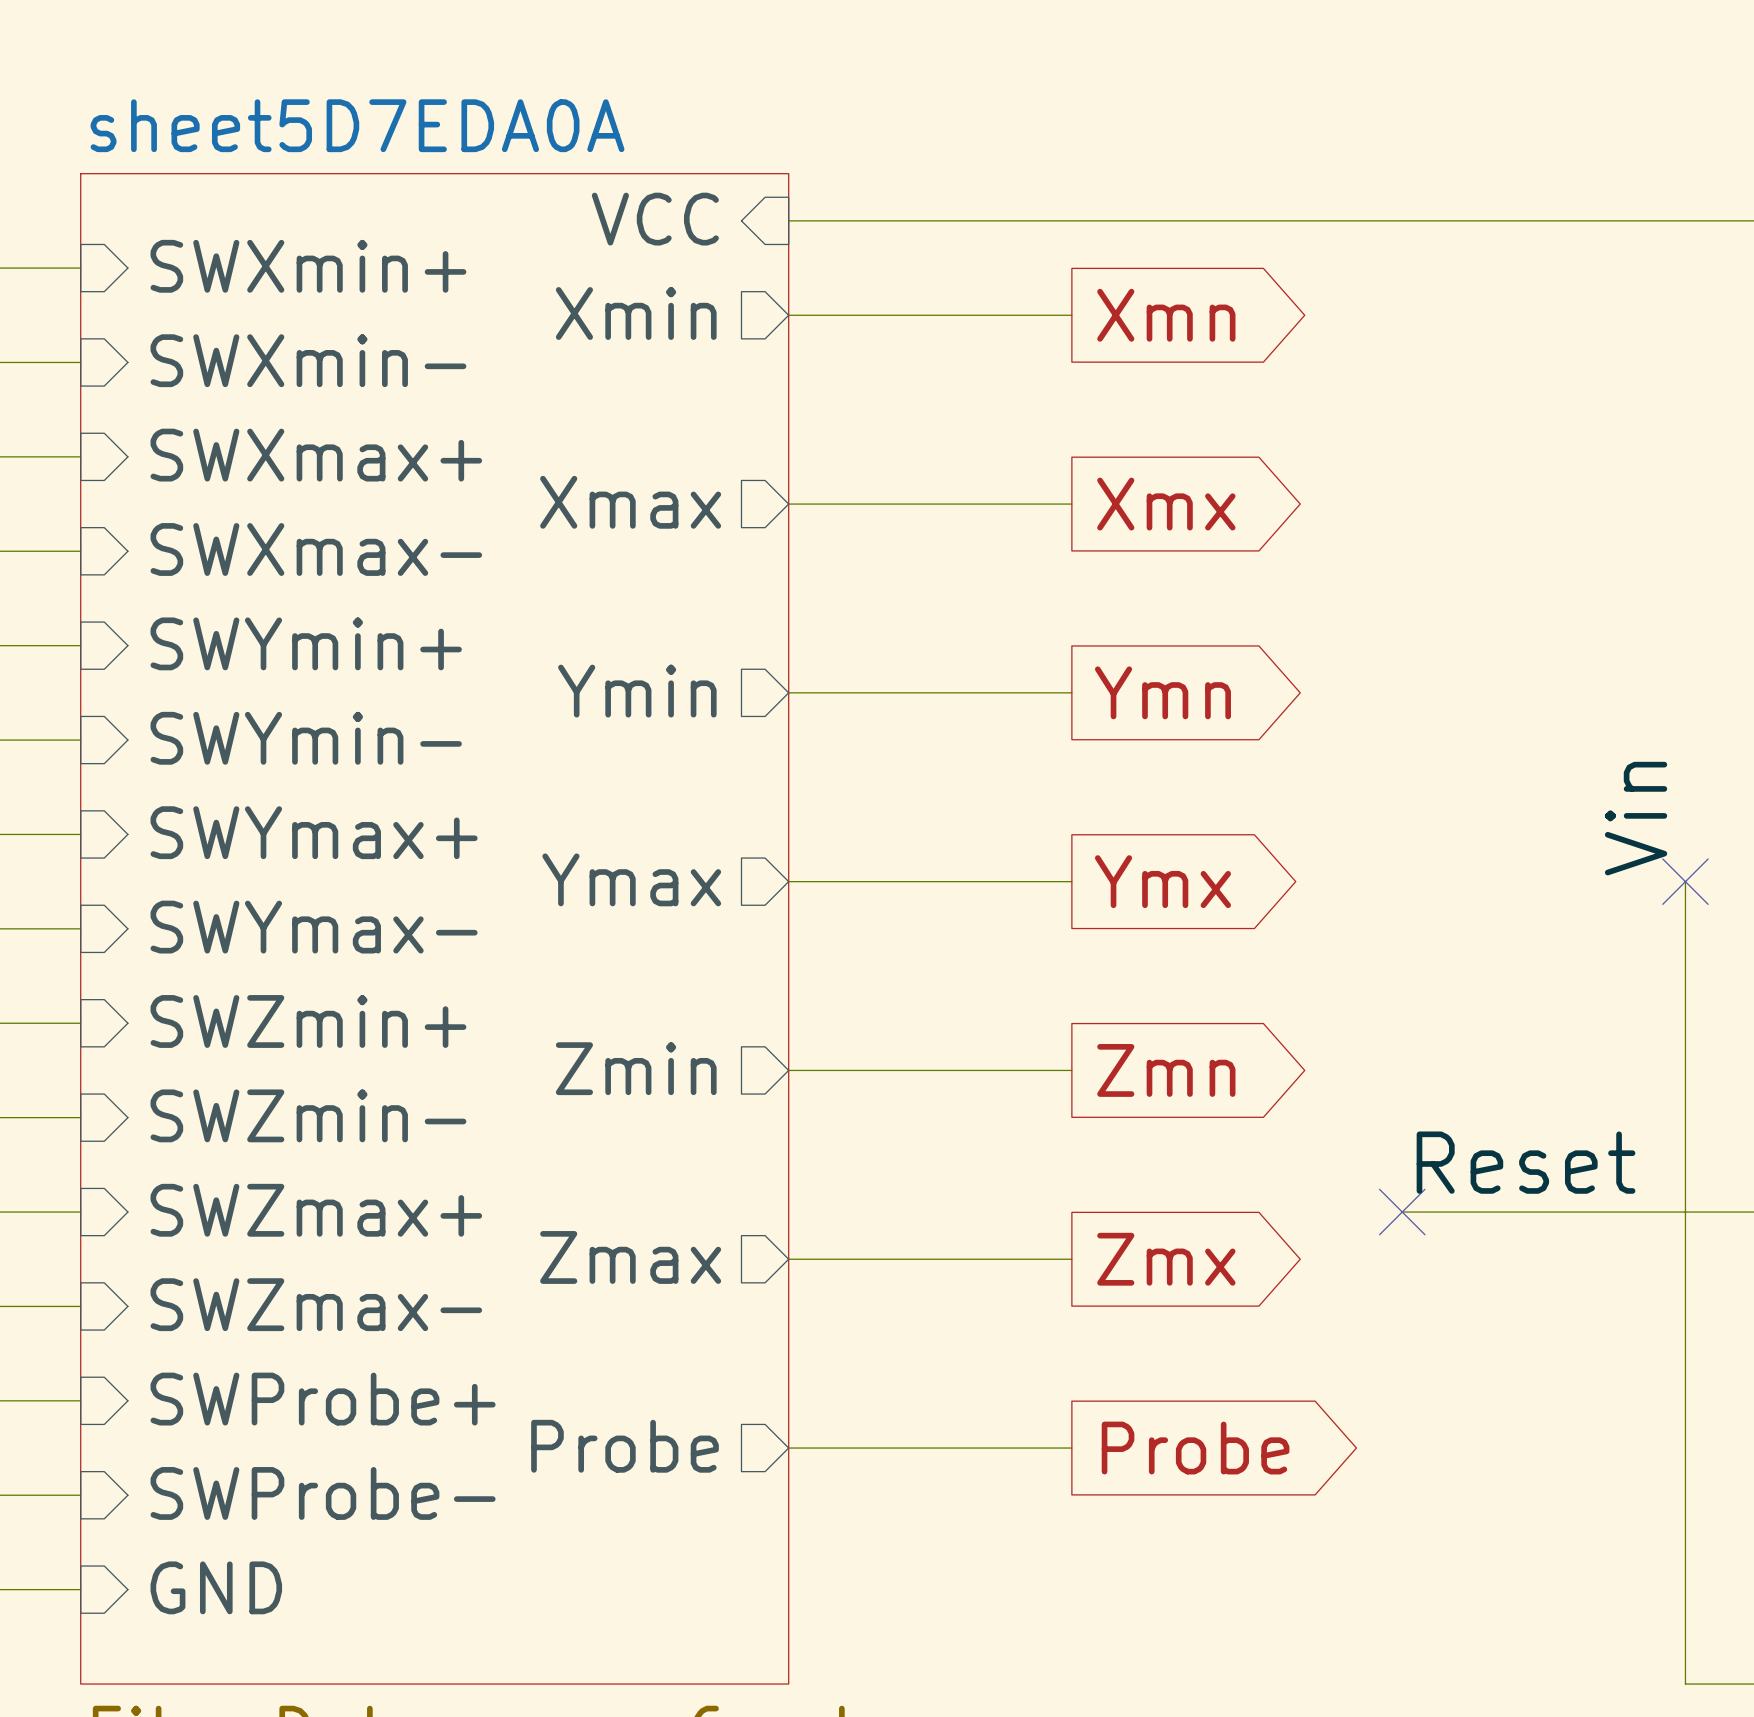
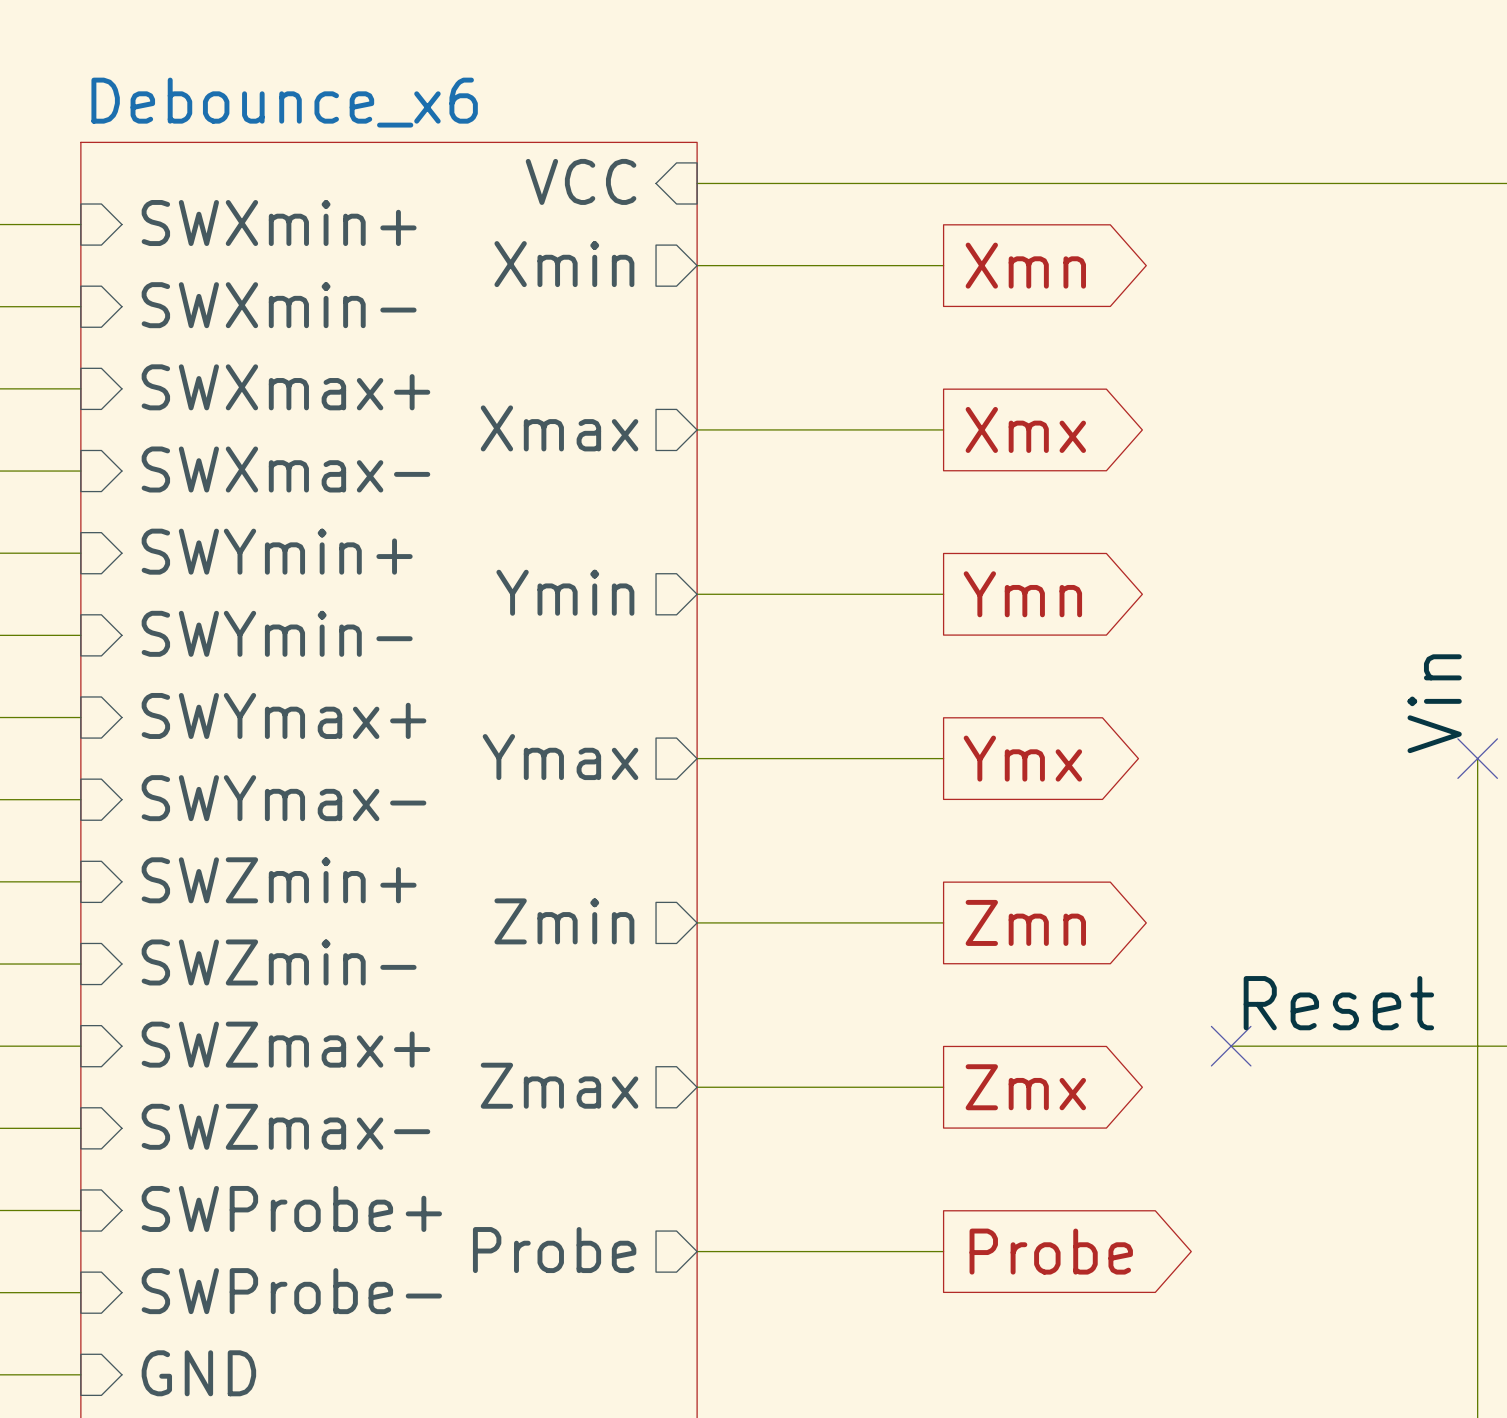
sheet sheet5D7EDA0A name: sheet5D7EDA0A (357, 125) -> Debounce_x6 (284, 102)

